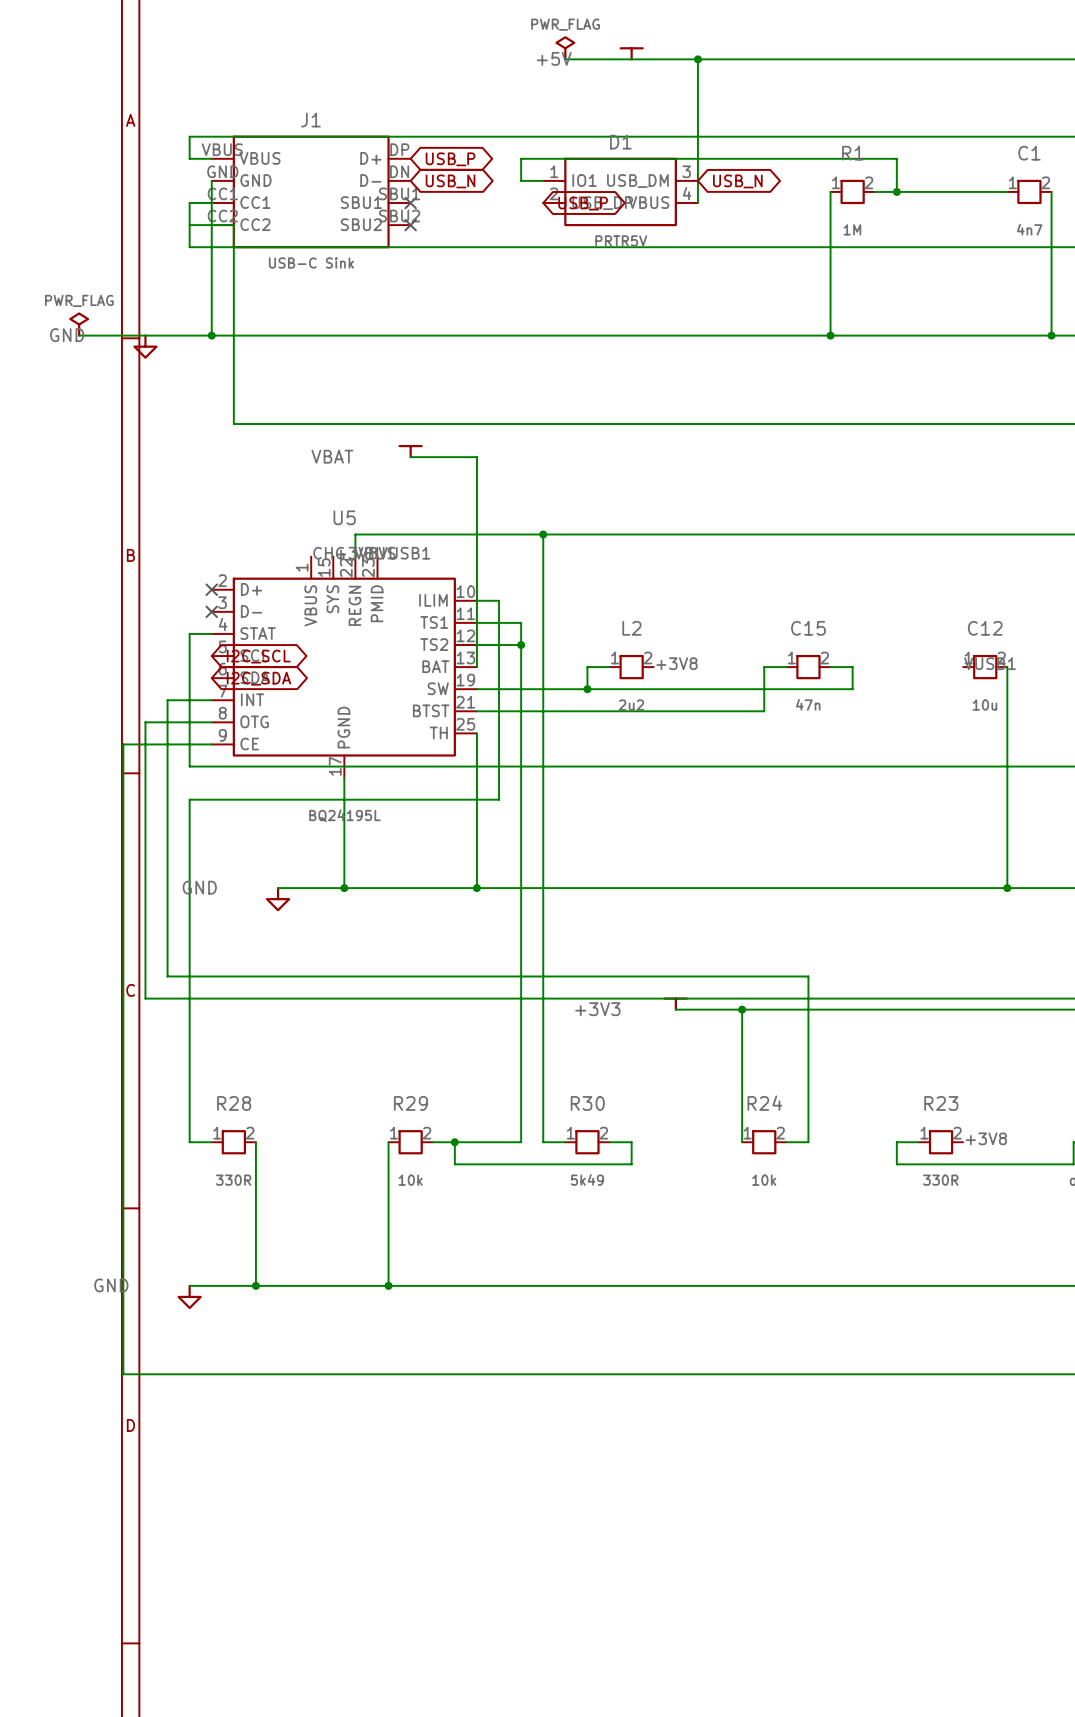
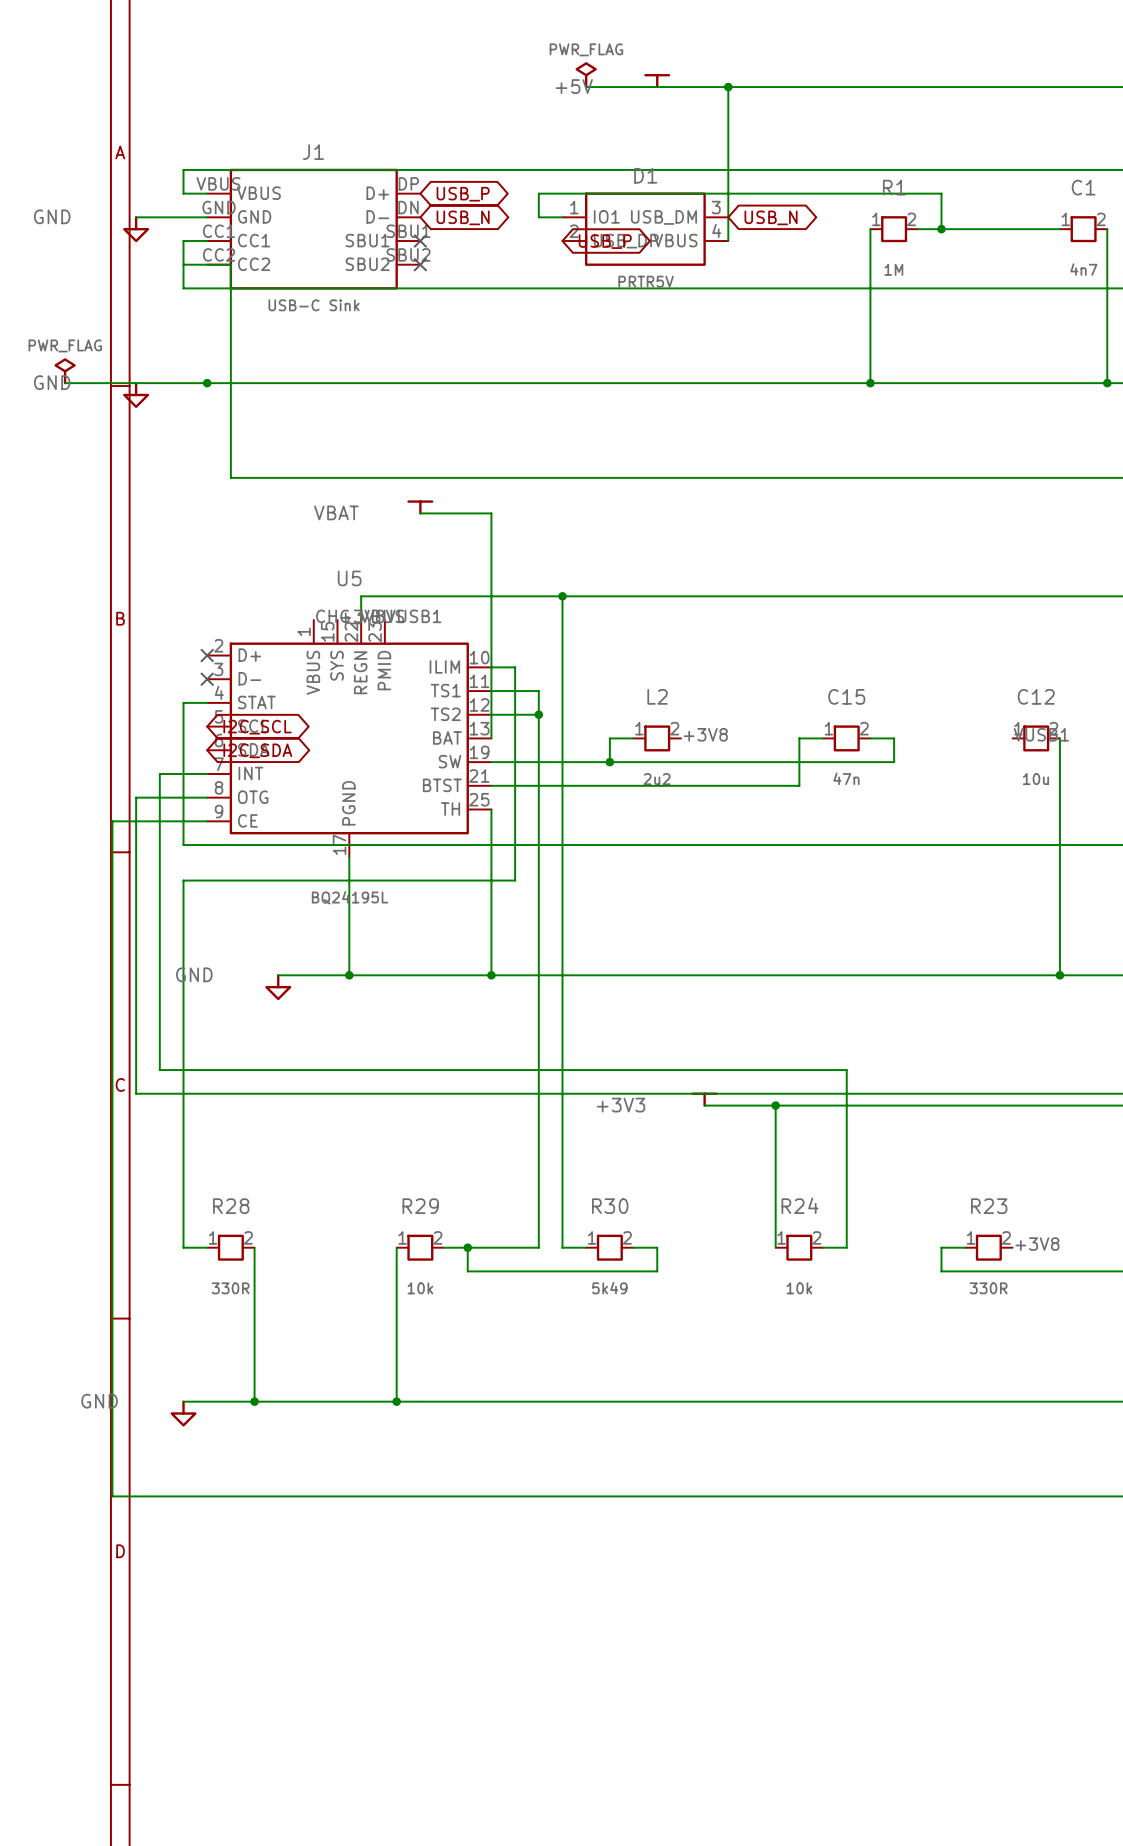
wire: (211, 180) (211, 335) -> (207, 217) (136, 217)
power symbol: none -> GND (136, 229)

